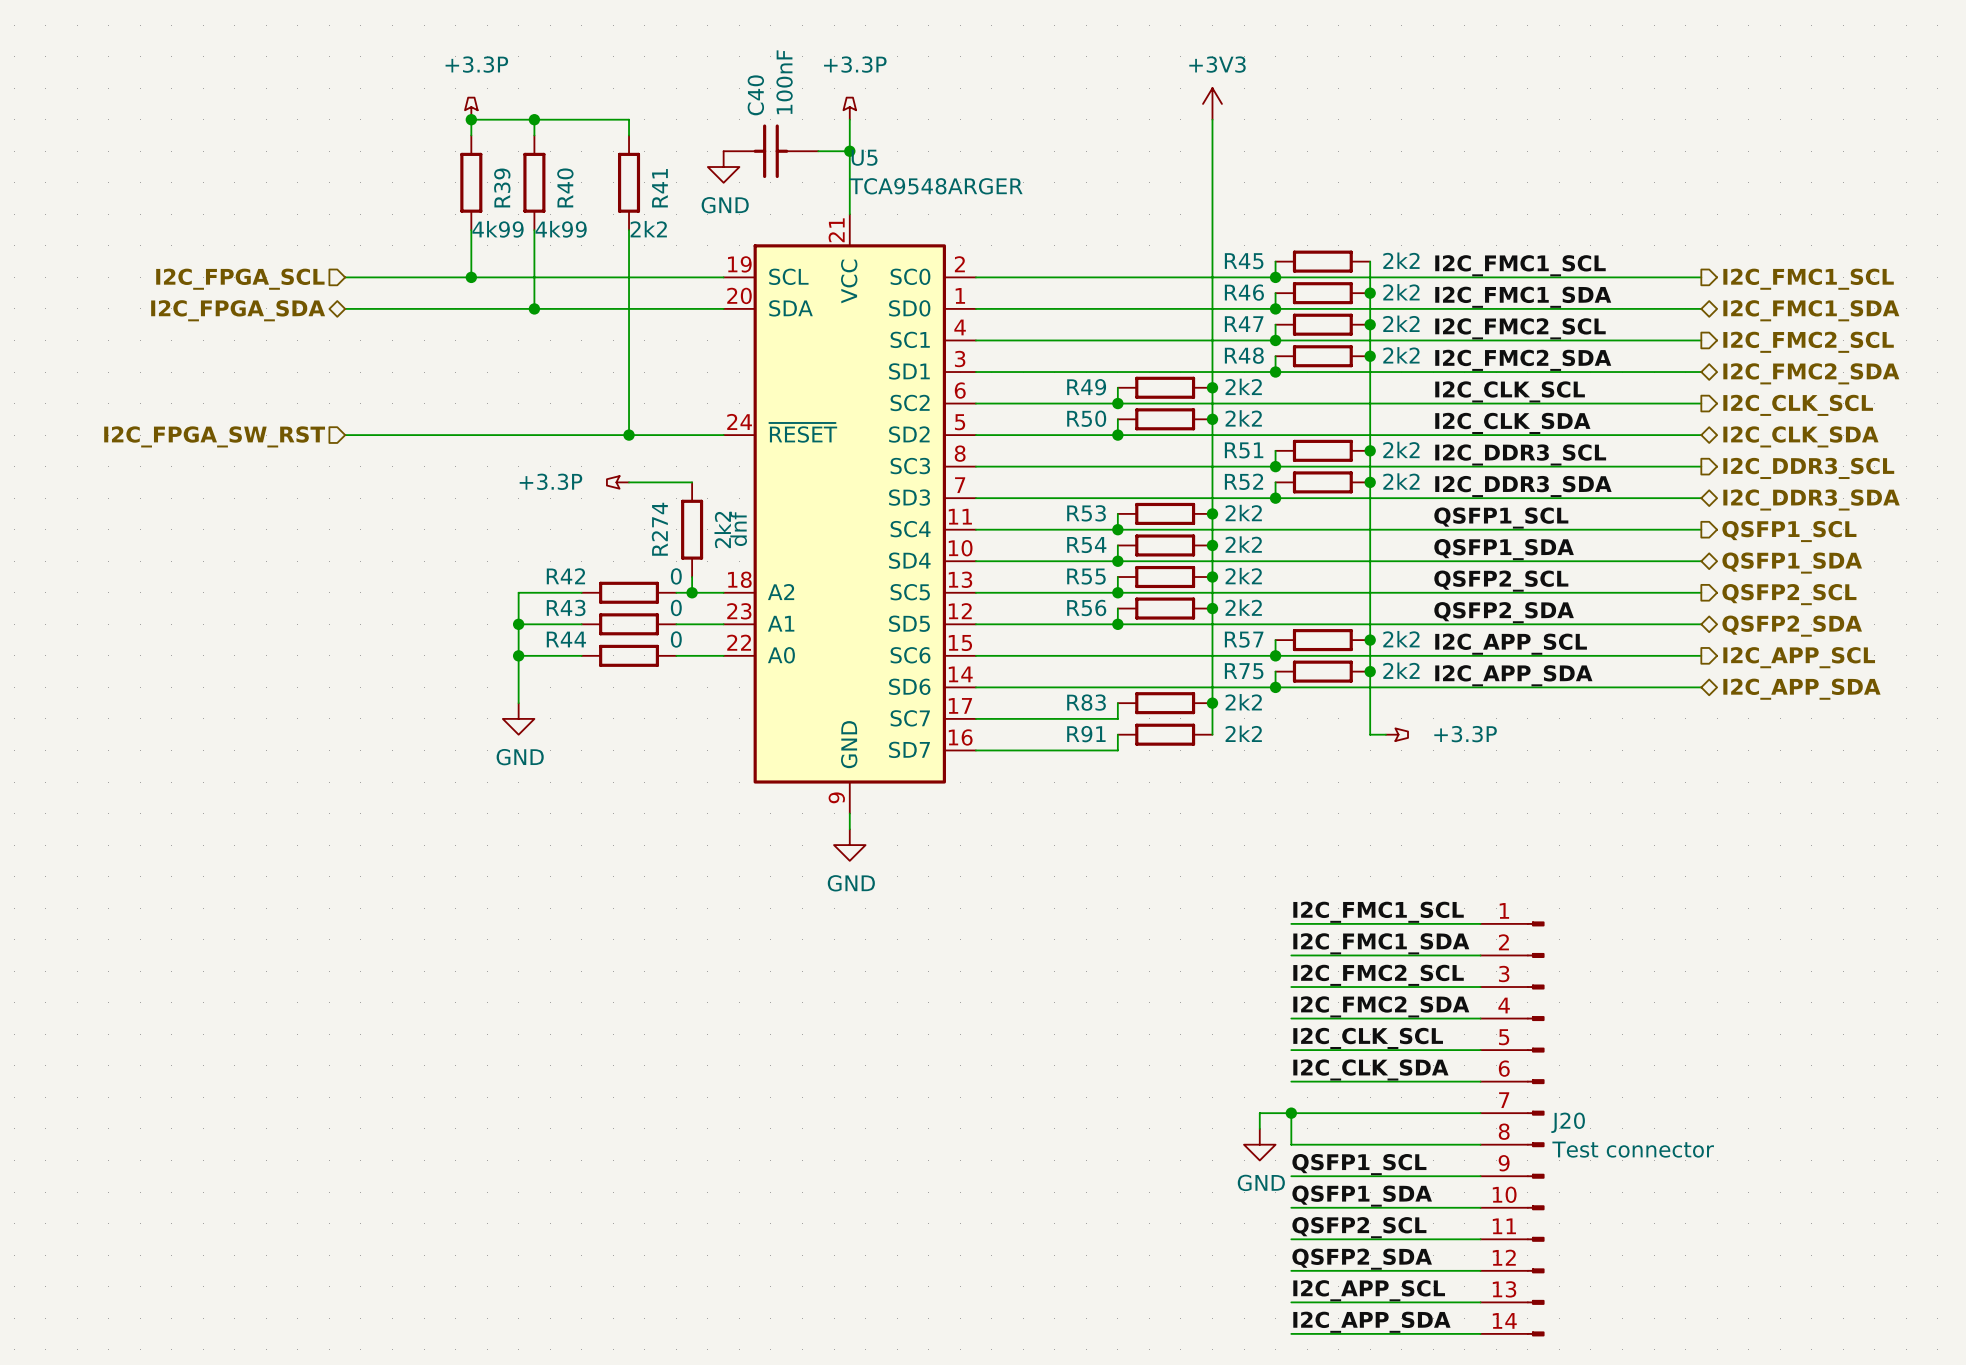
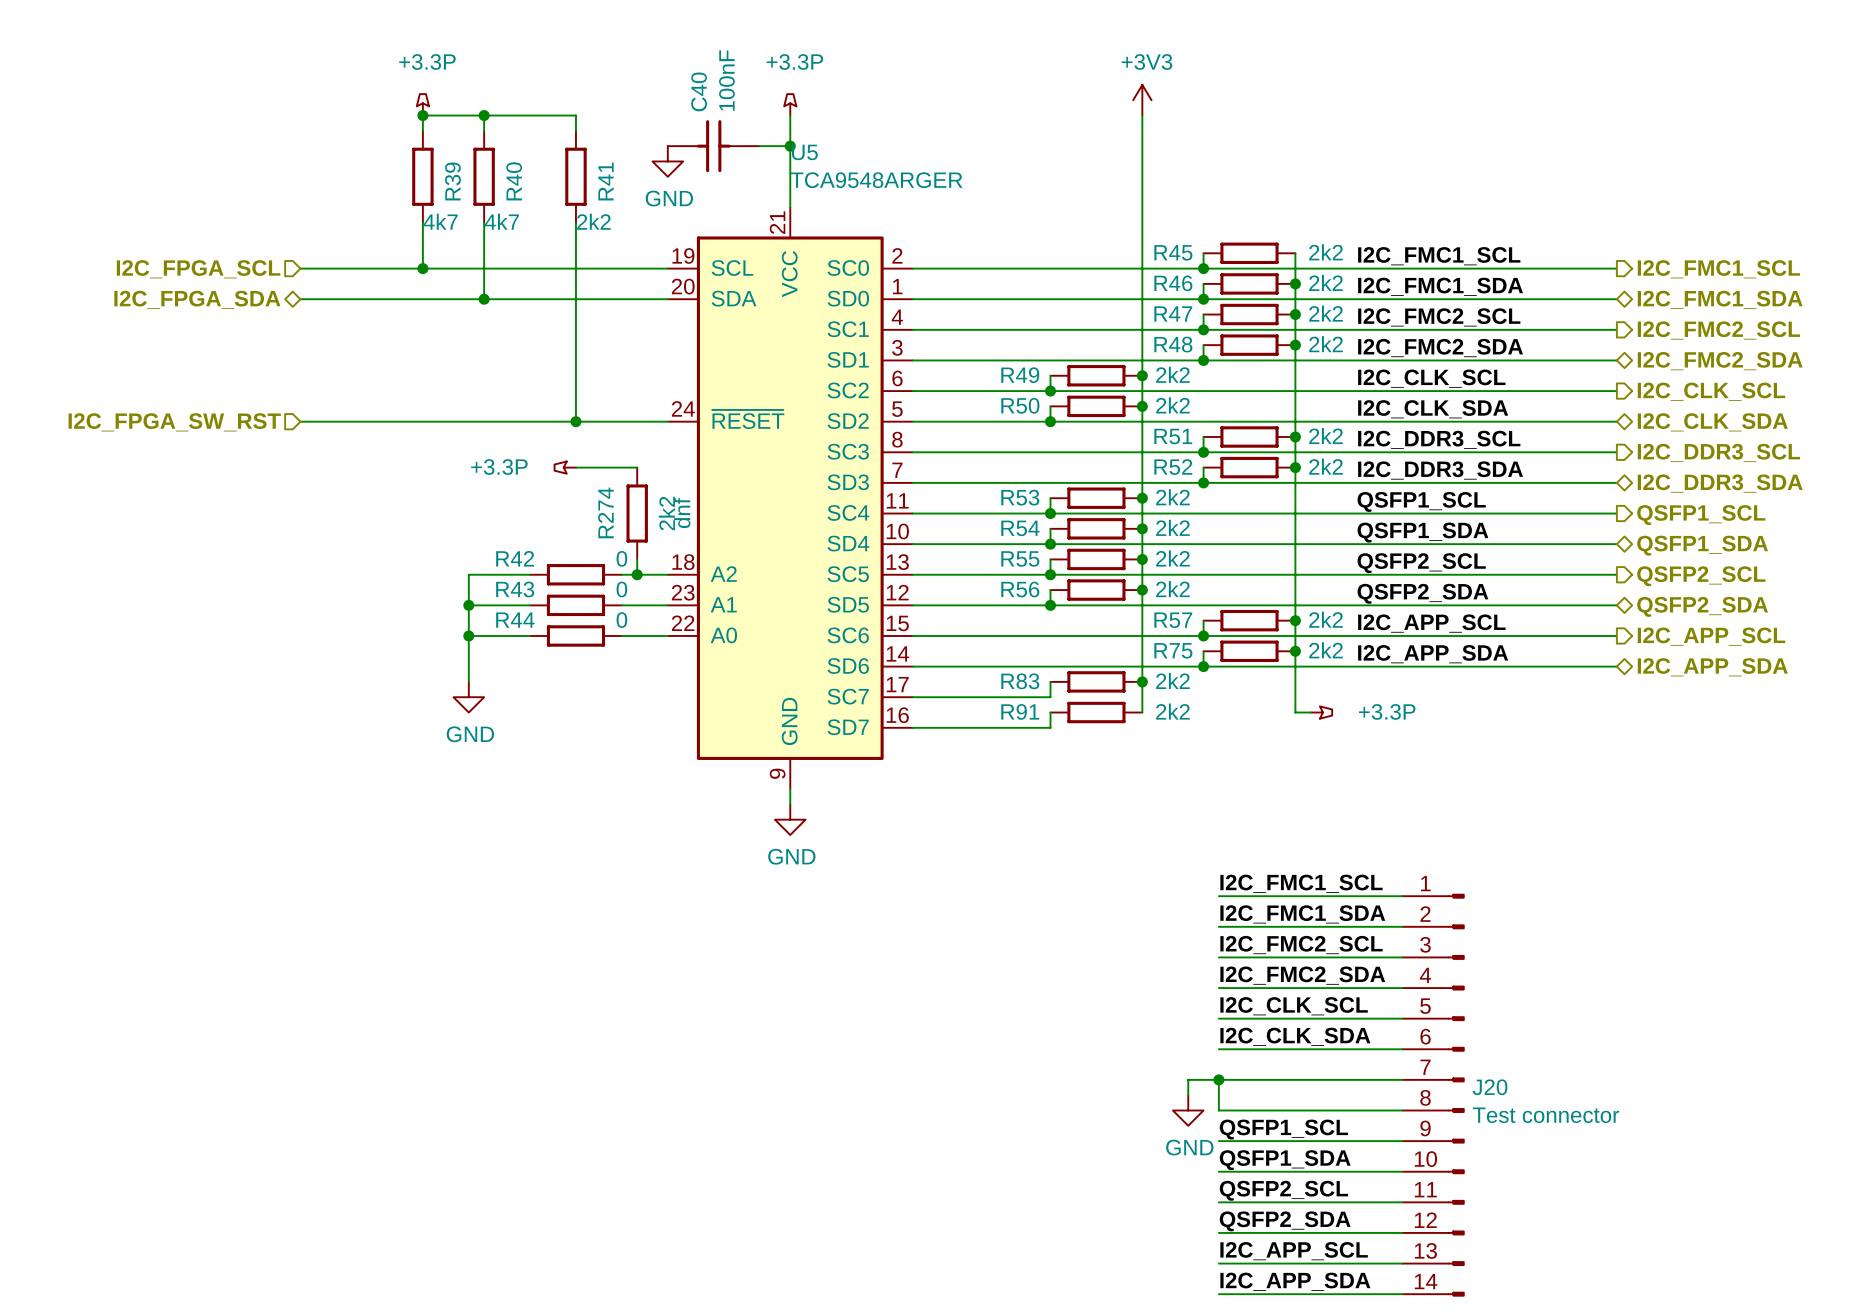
R39 text: 4k99 (498, 229) -> 4k7 (440, 221)
R40 text: 4k99 (561, 229) -> 4k7 (501, 221)

